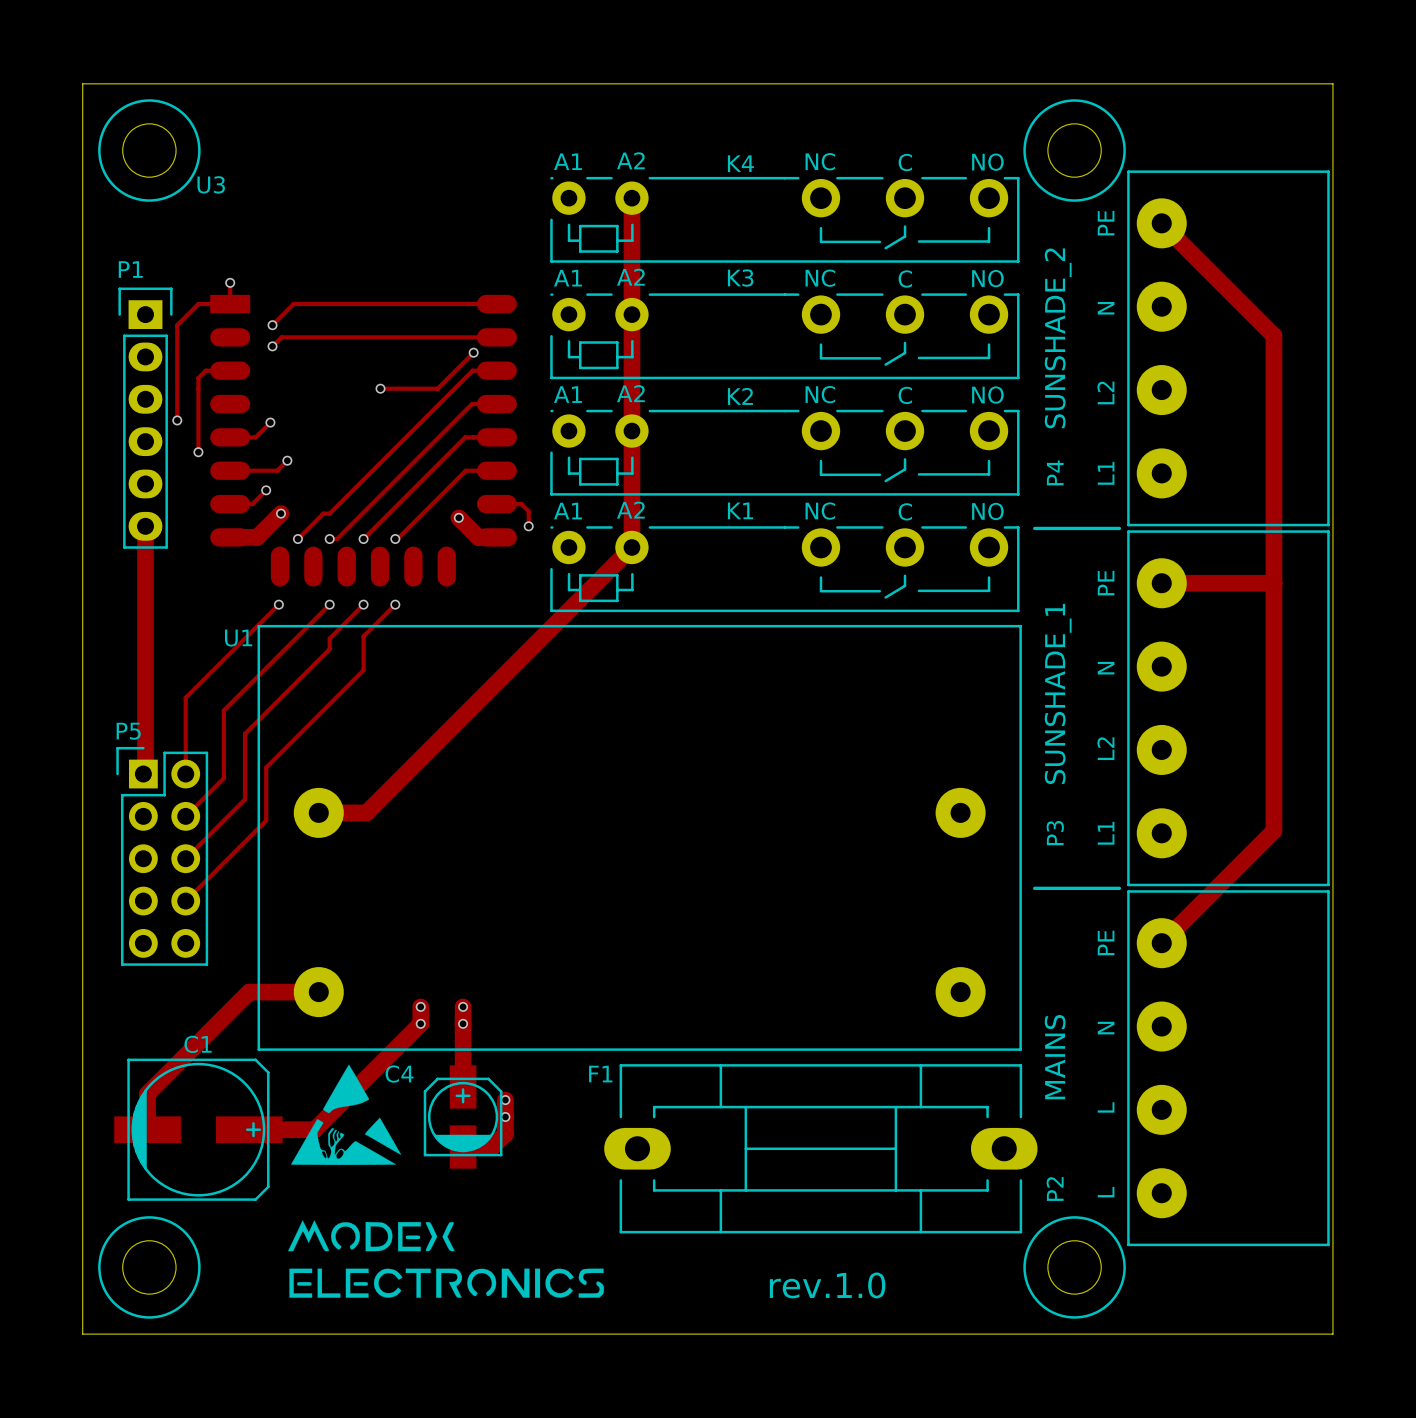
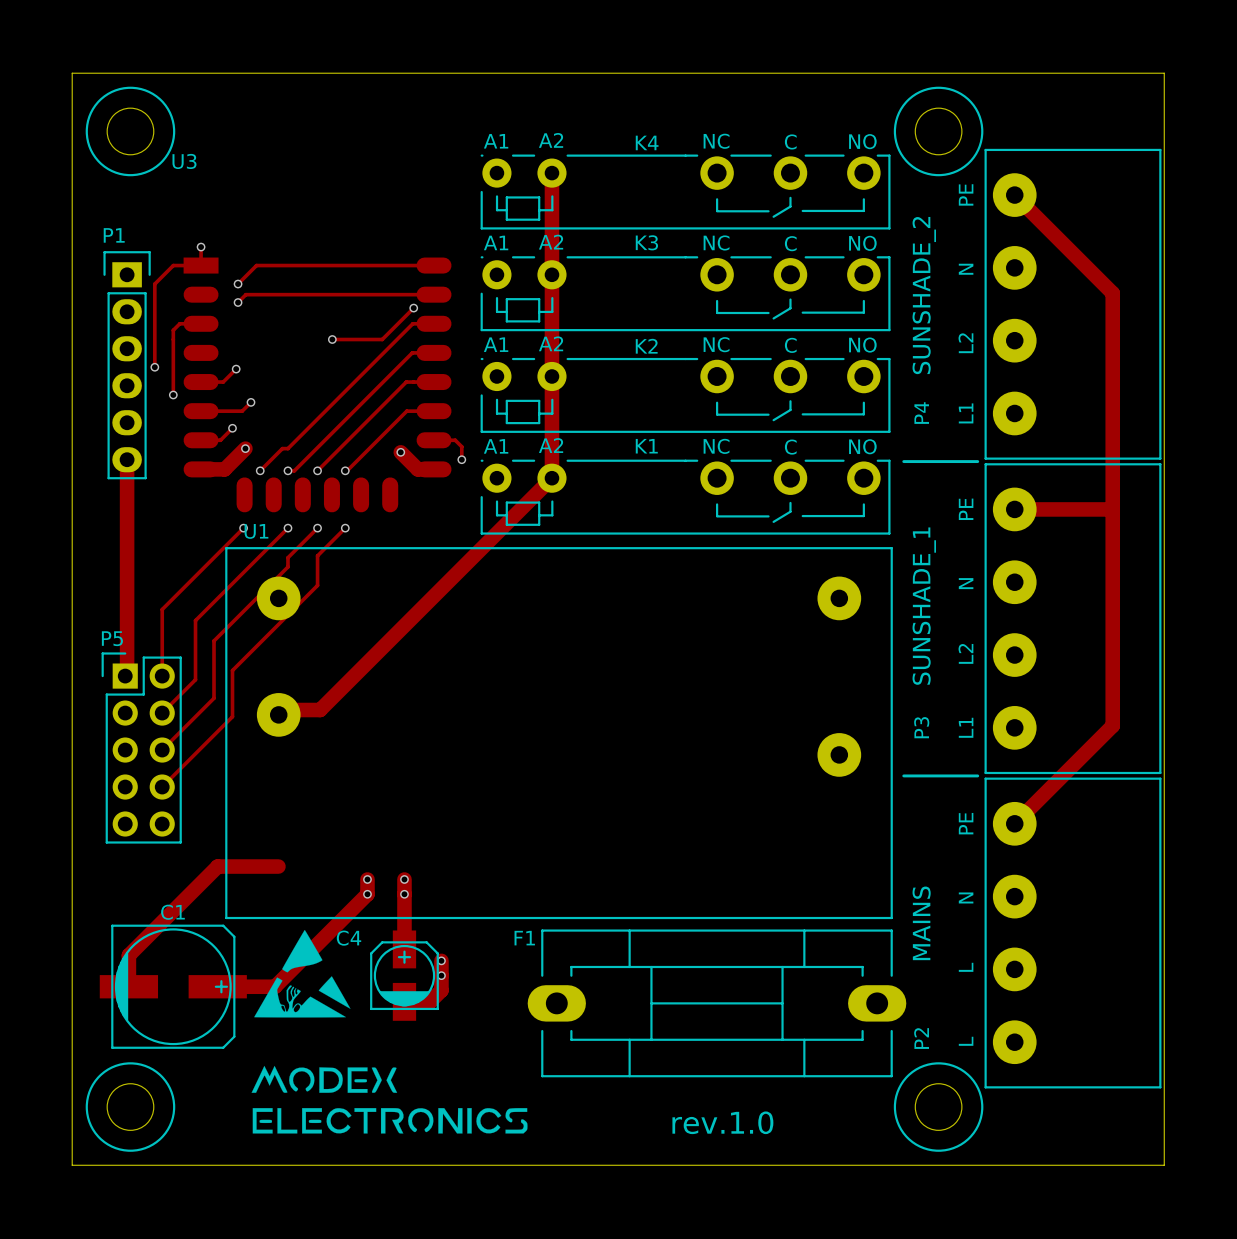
U1 footprint: [257, 624, 1022, 1051] -> [225, 547, 893, 920]
U1 name position: U1 (238, 638) -> U1 (256, 531)

